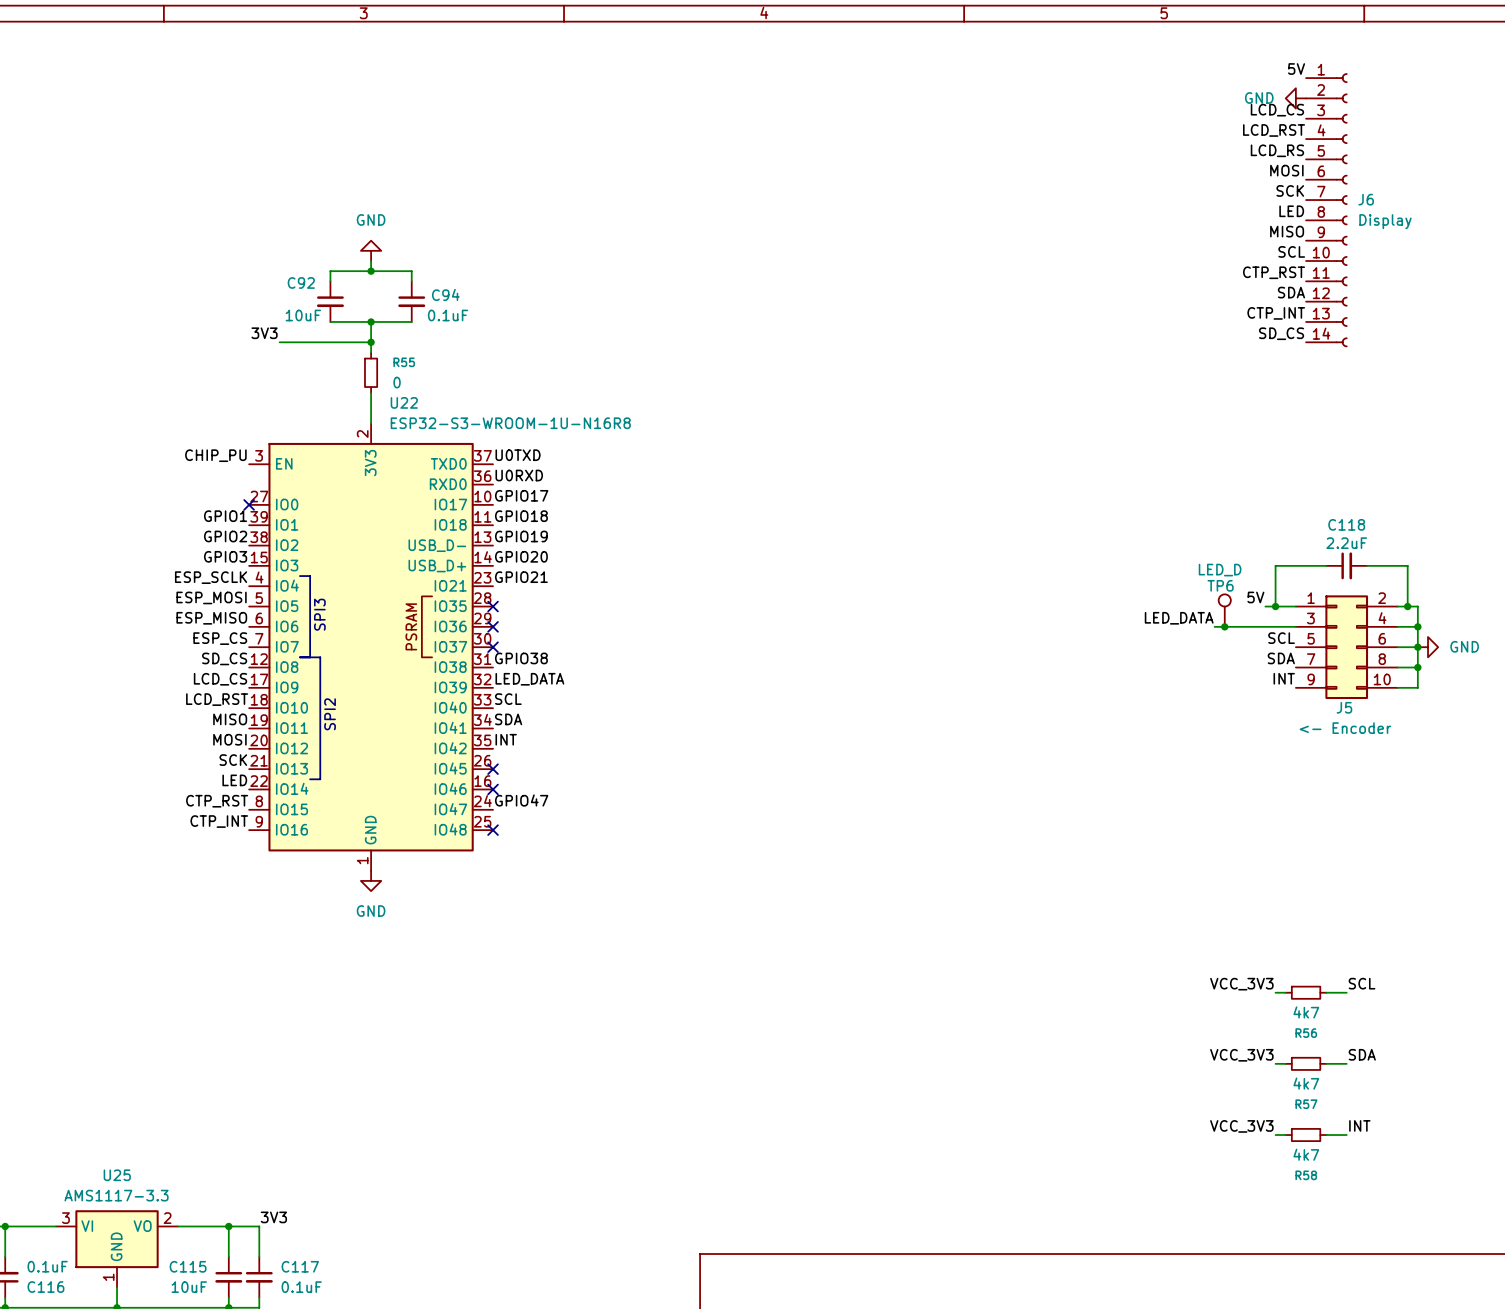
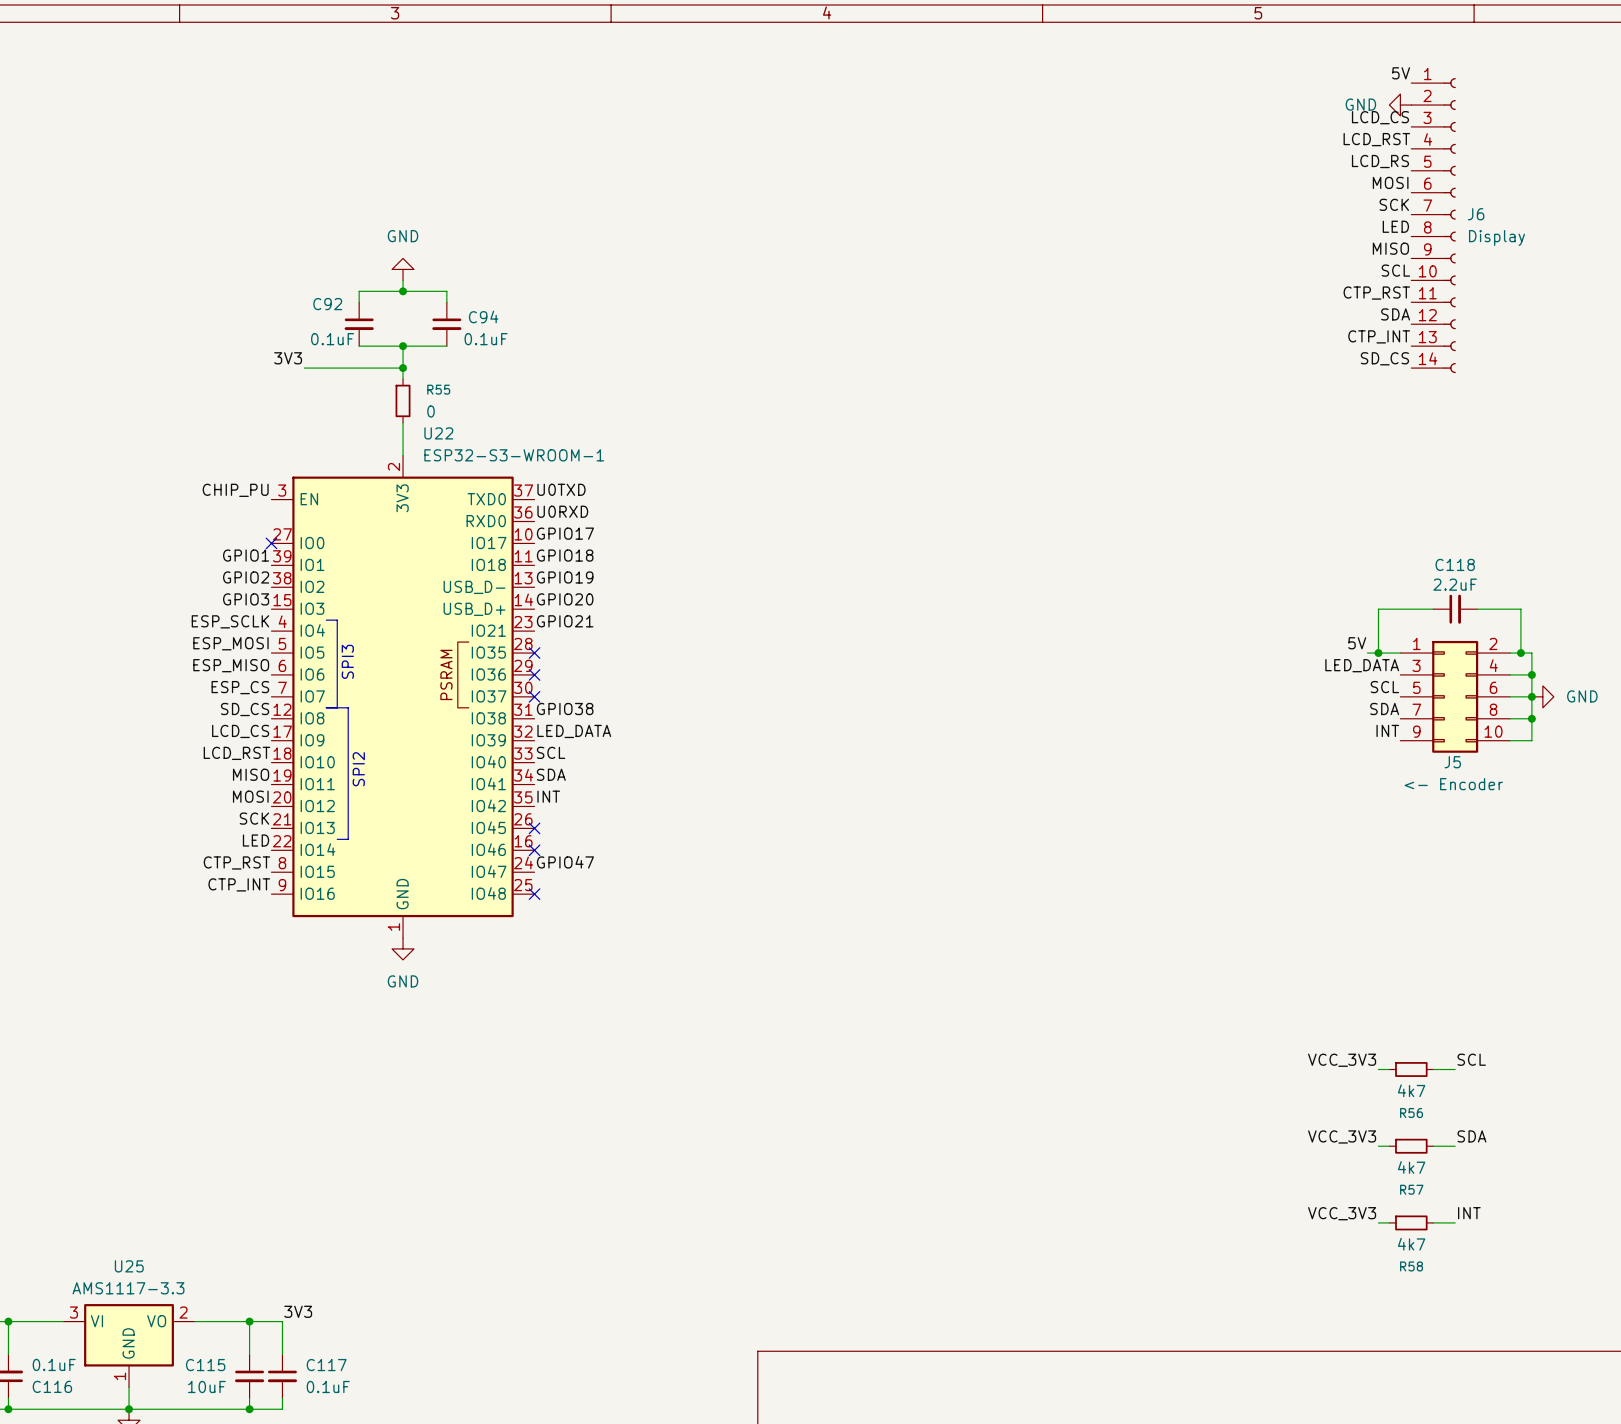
C92 value: 10uF (303, 315) -> 0.1uF (332, 339)
U22 value: ESP32-S3-WROOM-1U-N16R8 (510, 423) -> ESP32-S3-WROOM-1 (514, 455)
TP6: LED_D (1224, 610) -> none
label position: LED_DATA (1179, 618) -> LED_DATA (1362, 665)
wire: (1214, 626) (1295, 626) -> none
junction: (1224, 626) -> none

